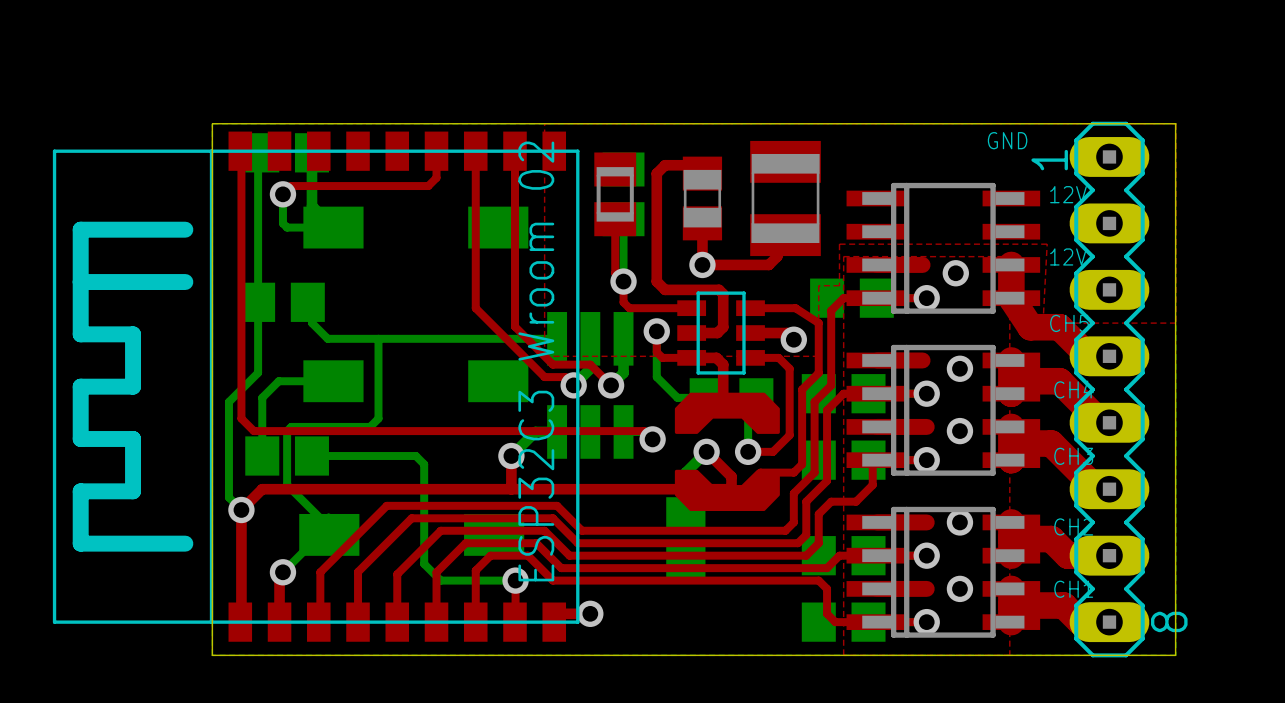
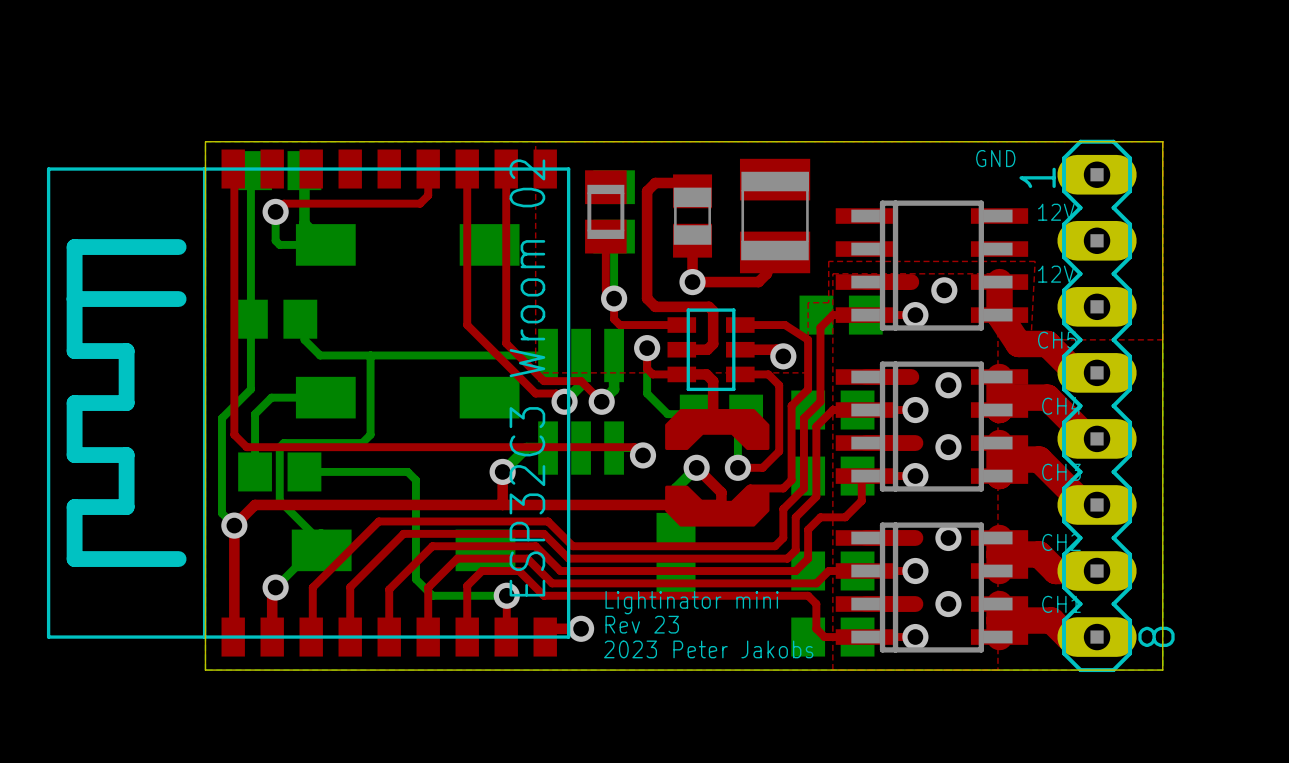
text: none -> Lightinator mini (692, 602)
text: none -> Rev 23 (642, 624)
text: none -> 2023 Peter Jakobs (708, 649)

